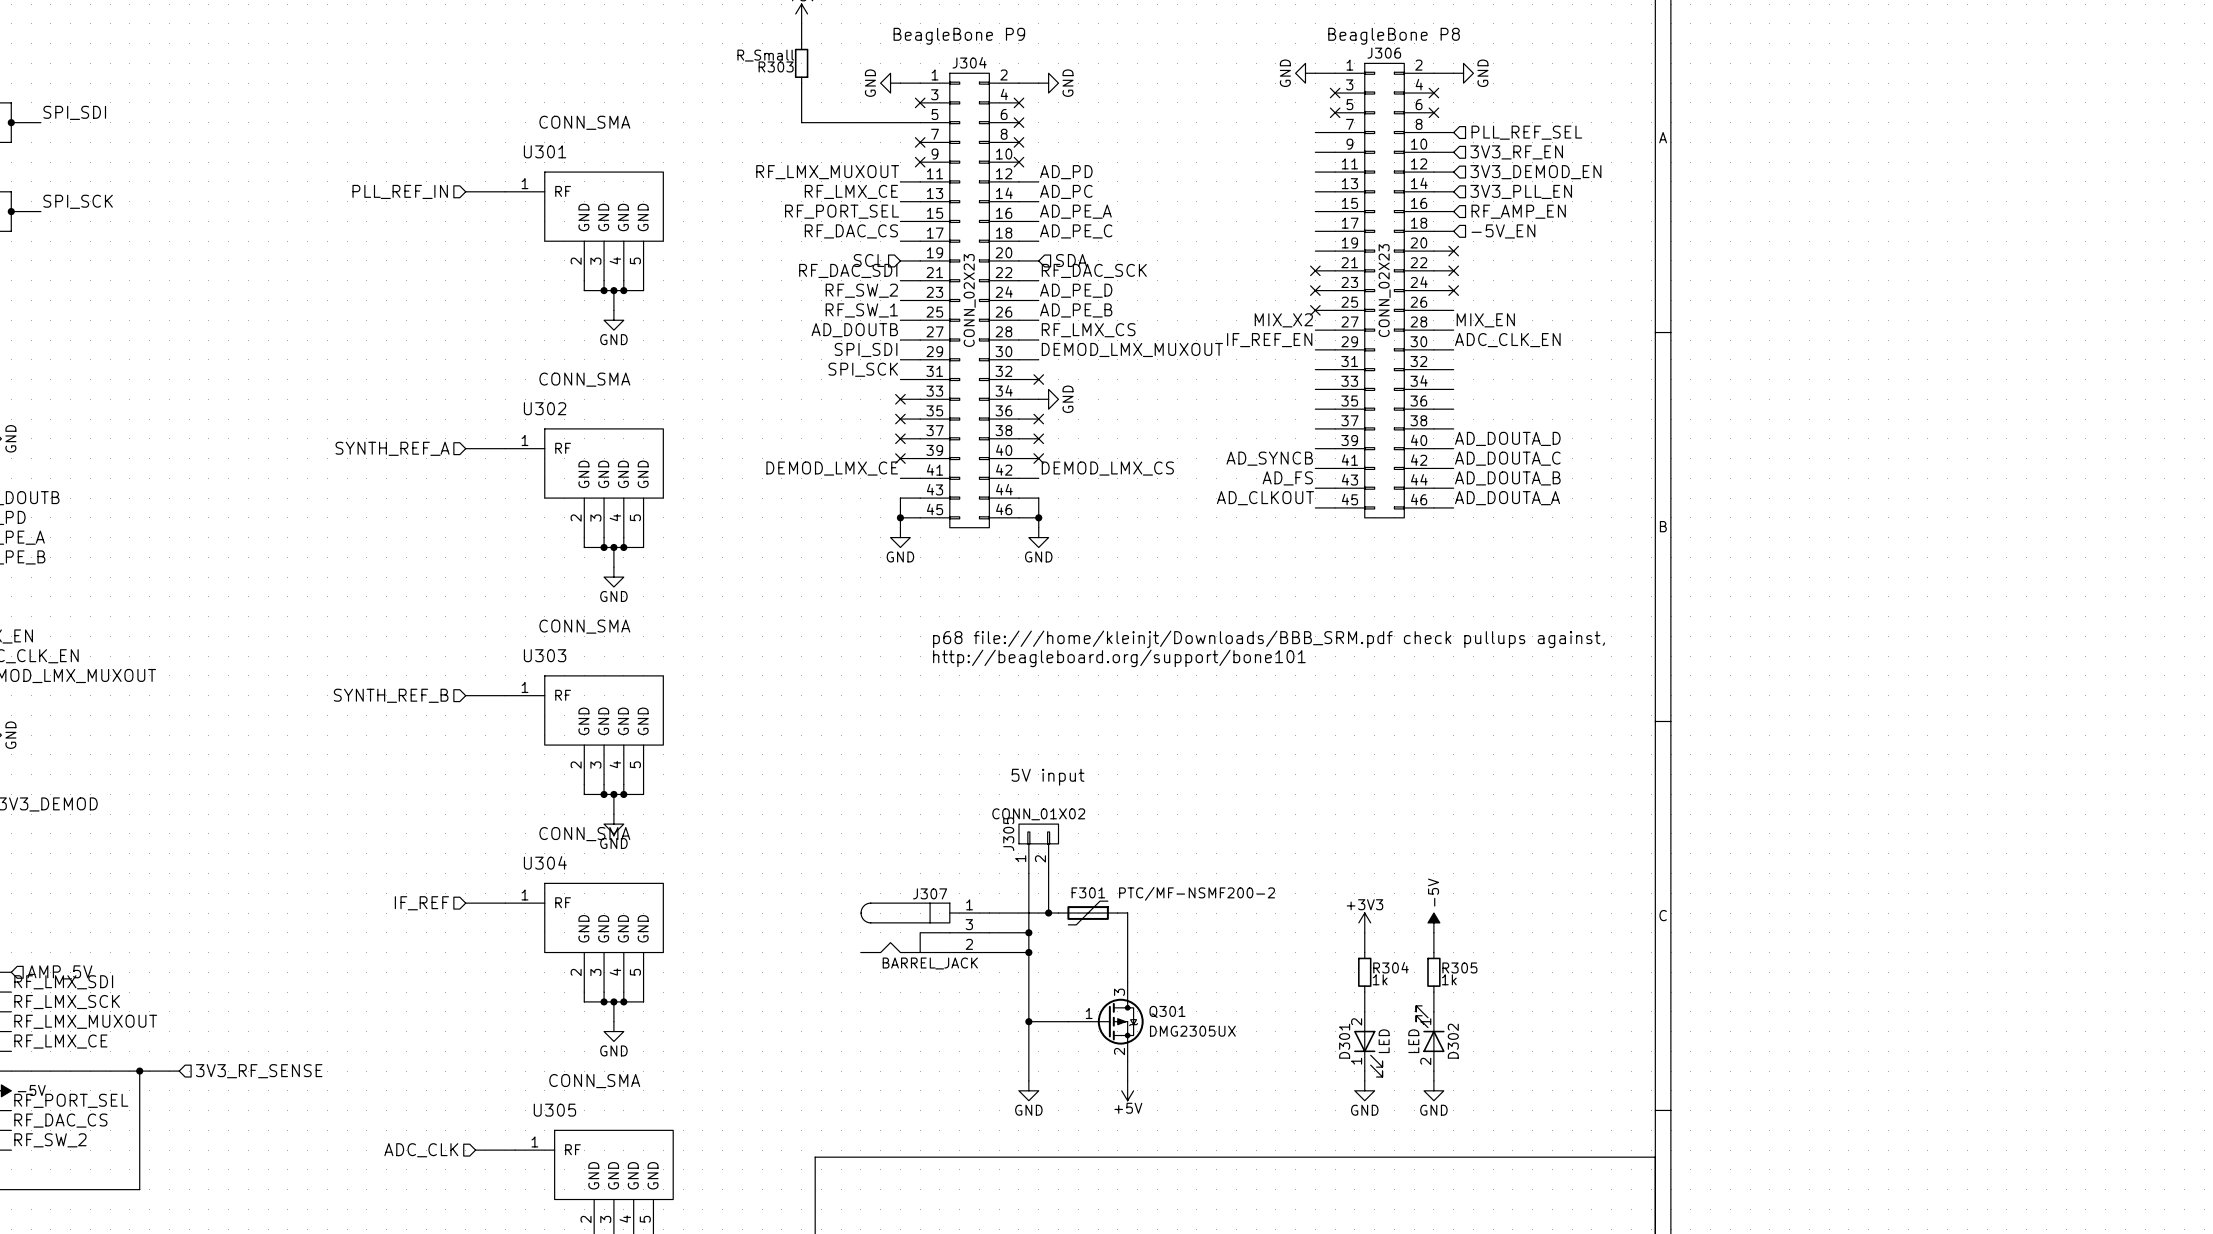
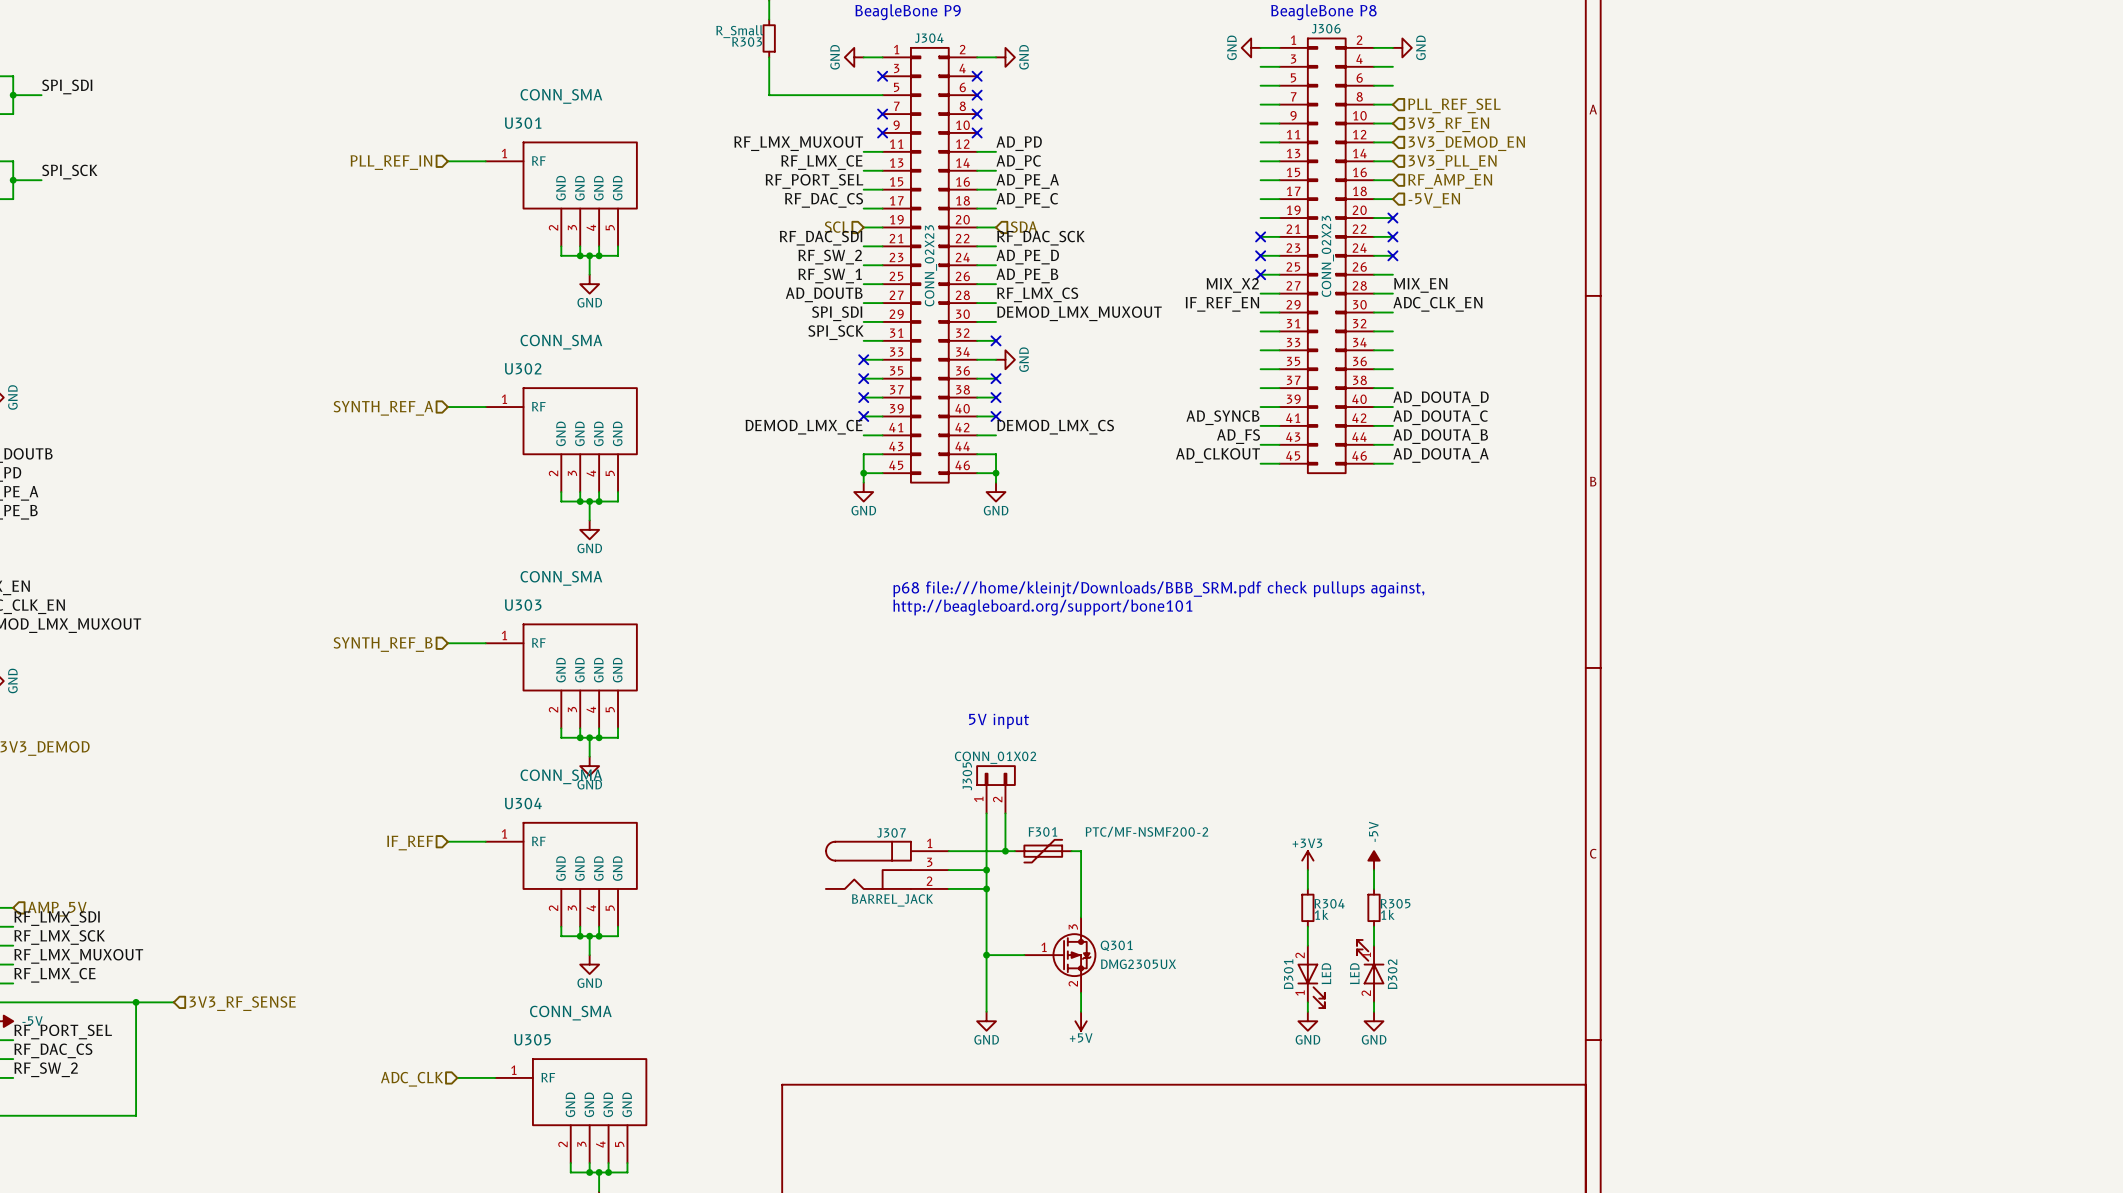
wire: none -> (1260, 66) (1279, 66)
no-connect mark: (1335, 93) -> none
wire: none -> (1374, 66) (1392, 66)
no-connect mark: (1433, 93) -> none
wire: none -> (1260, 85) (1279, 85)
no-connect mark: (1335, 112) -> none
wire: none -> (1374, 85) (1392, 85)
no-connect mark: (1433, 112) -> none

